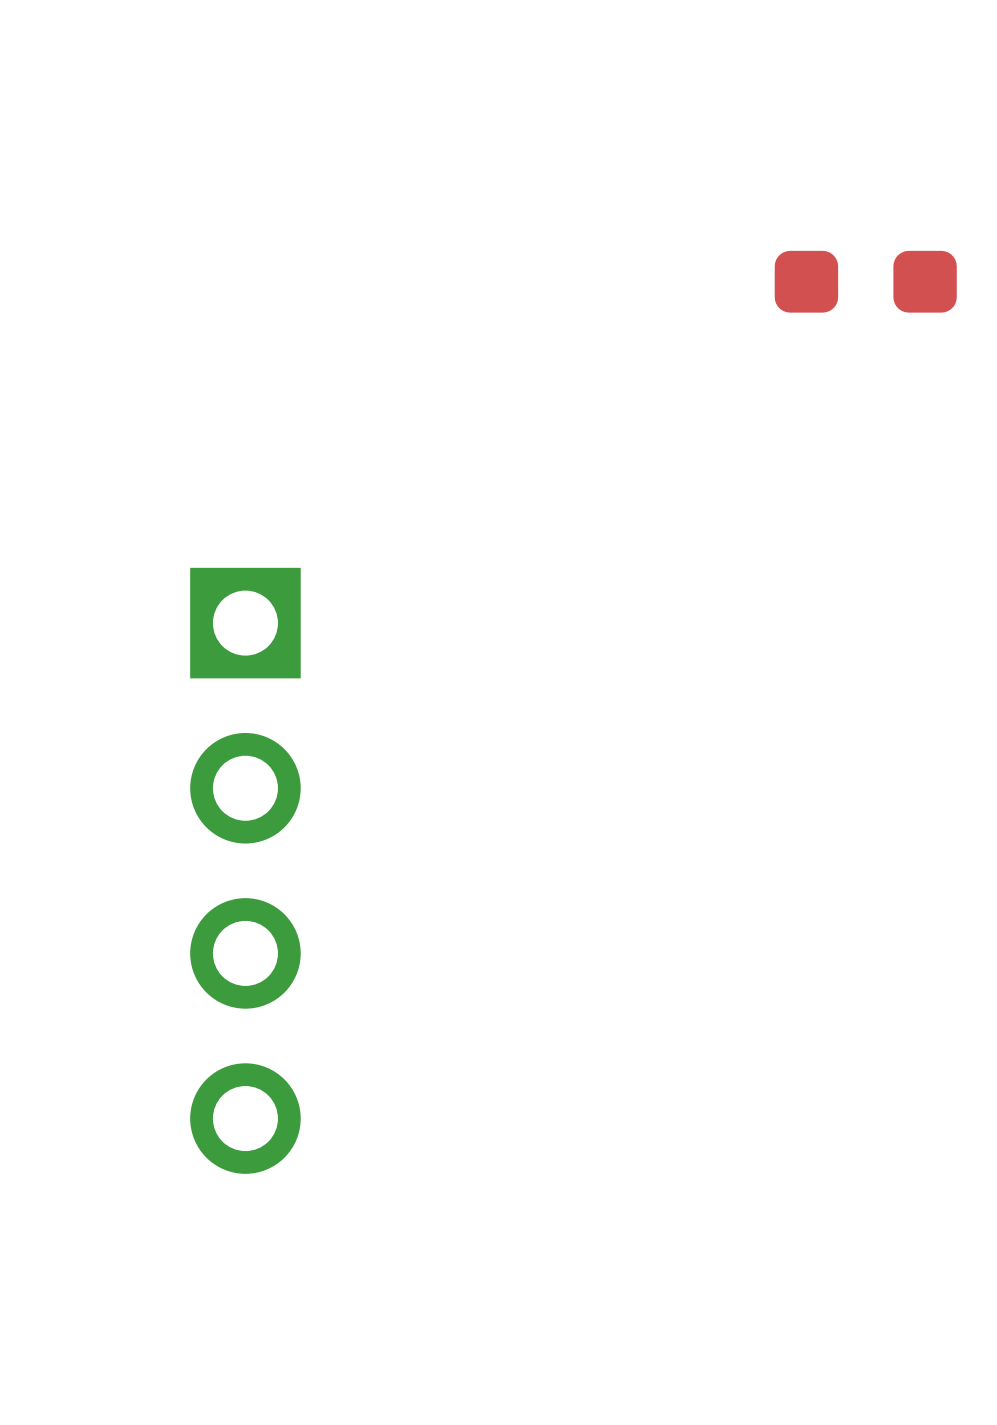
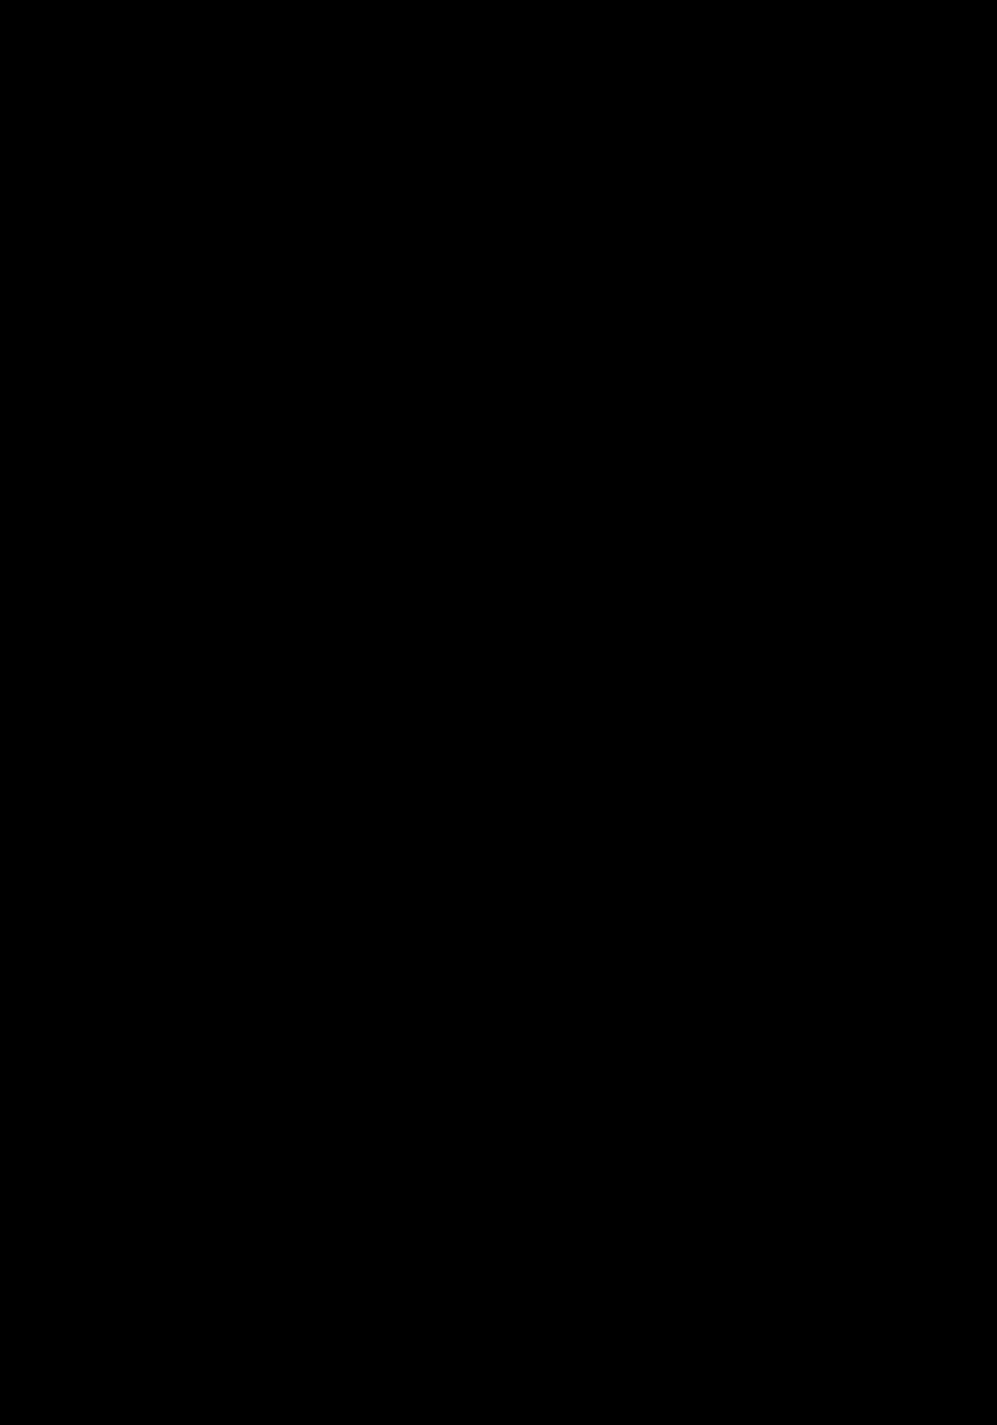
part: (865, 281) -> none
part: (245, 870) -> none

